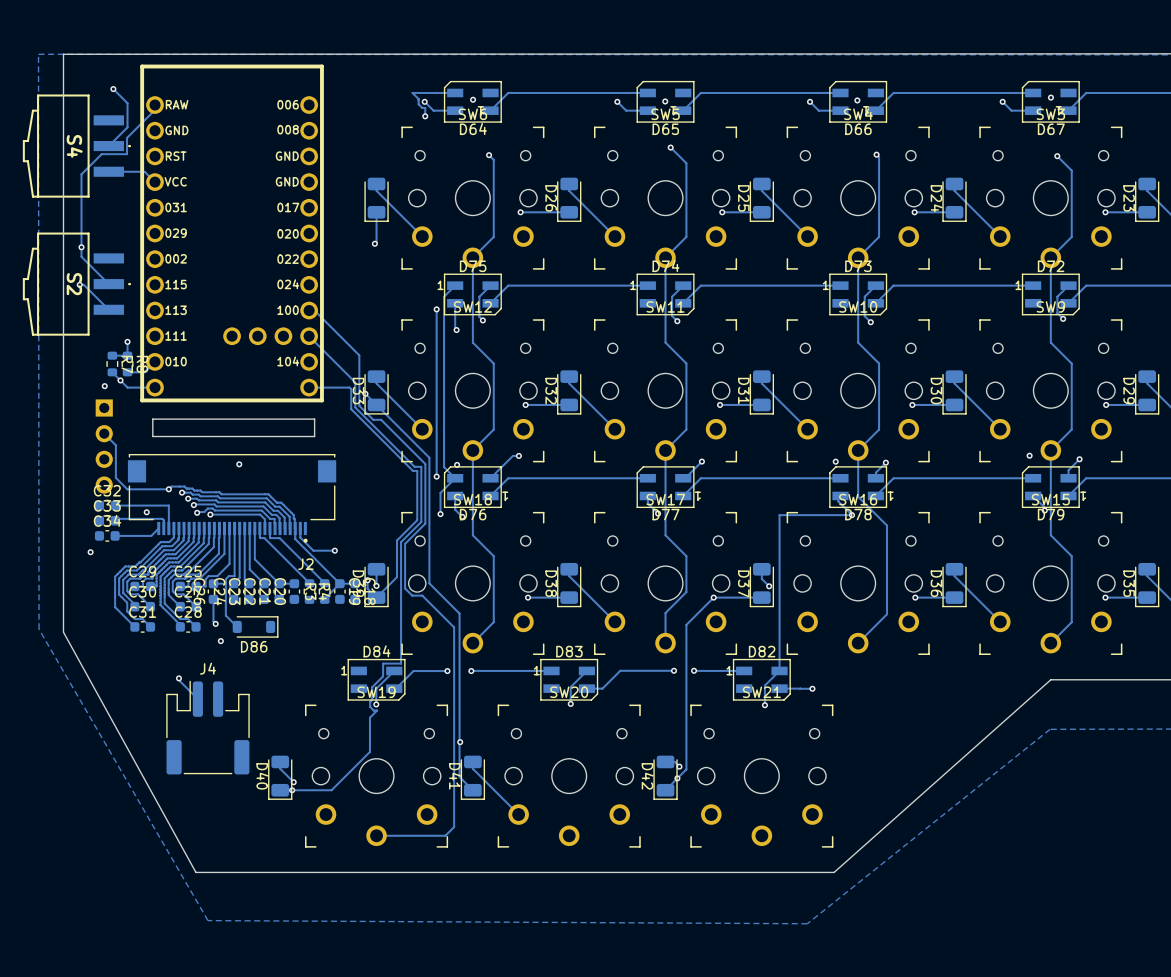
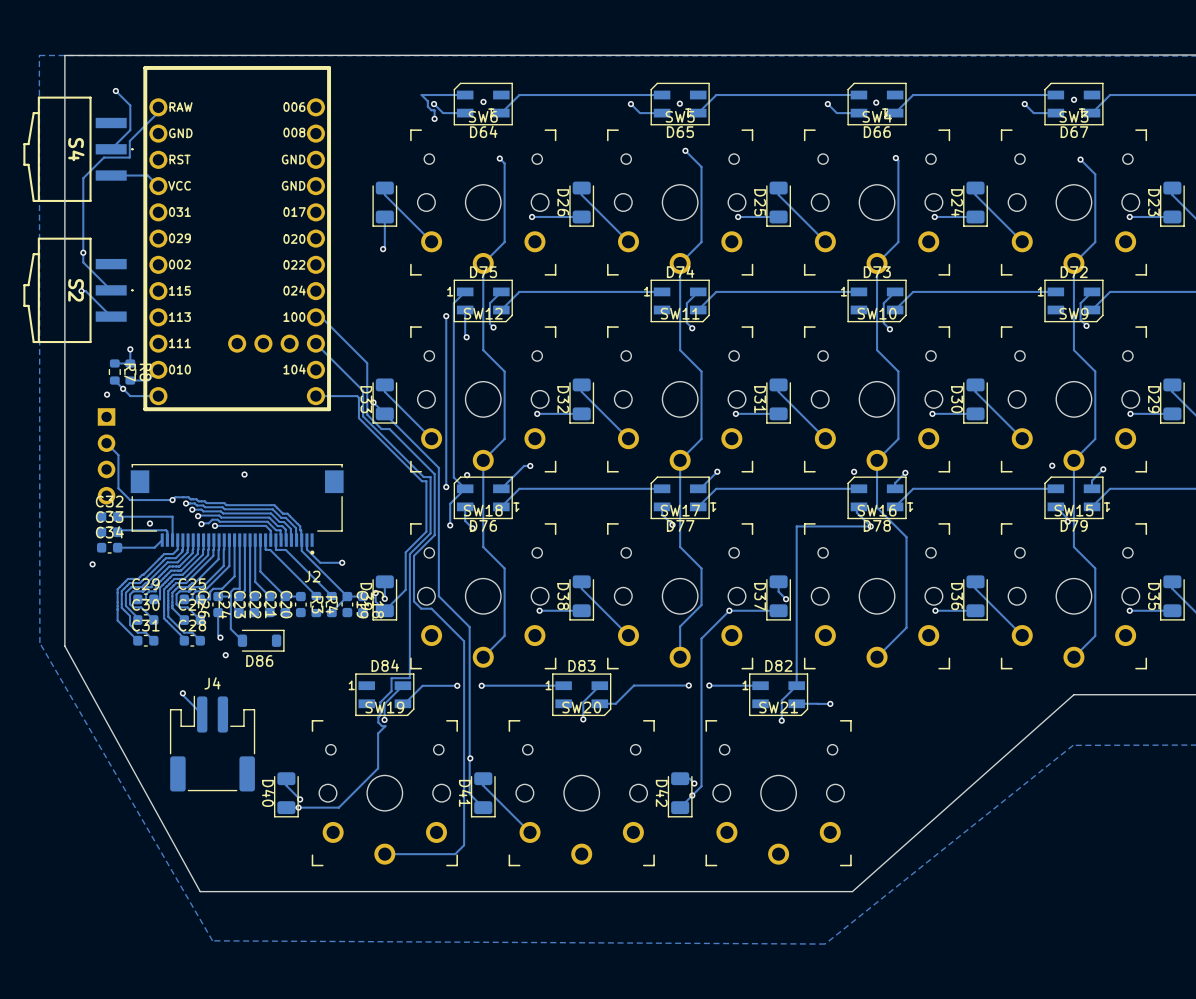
board edge: (314, 419) (152, 419) (152, 436) (314, 436) (314, 419) -> none

